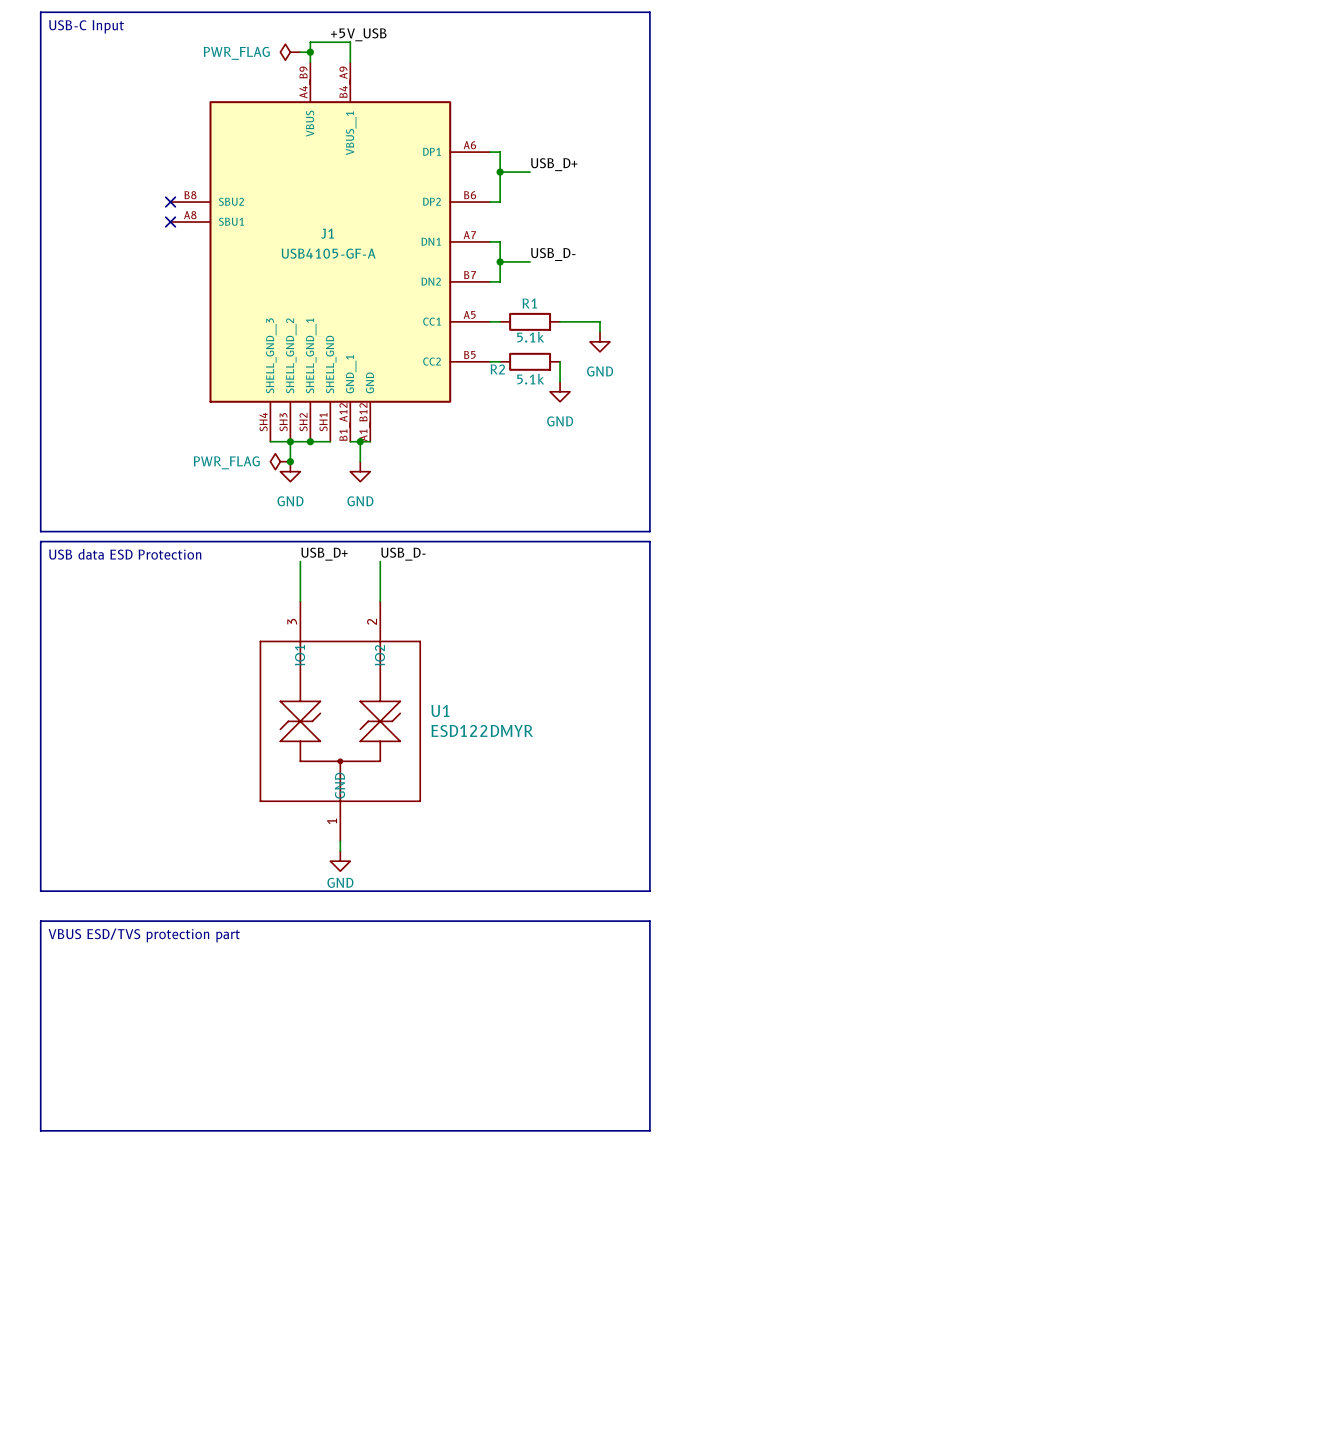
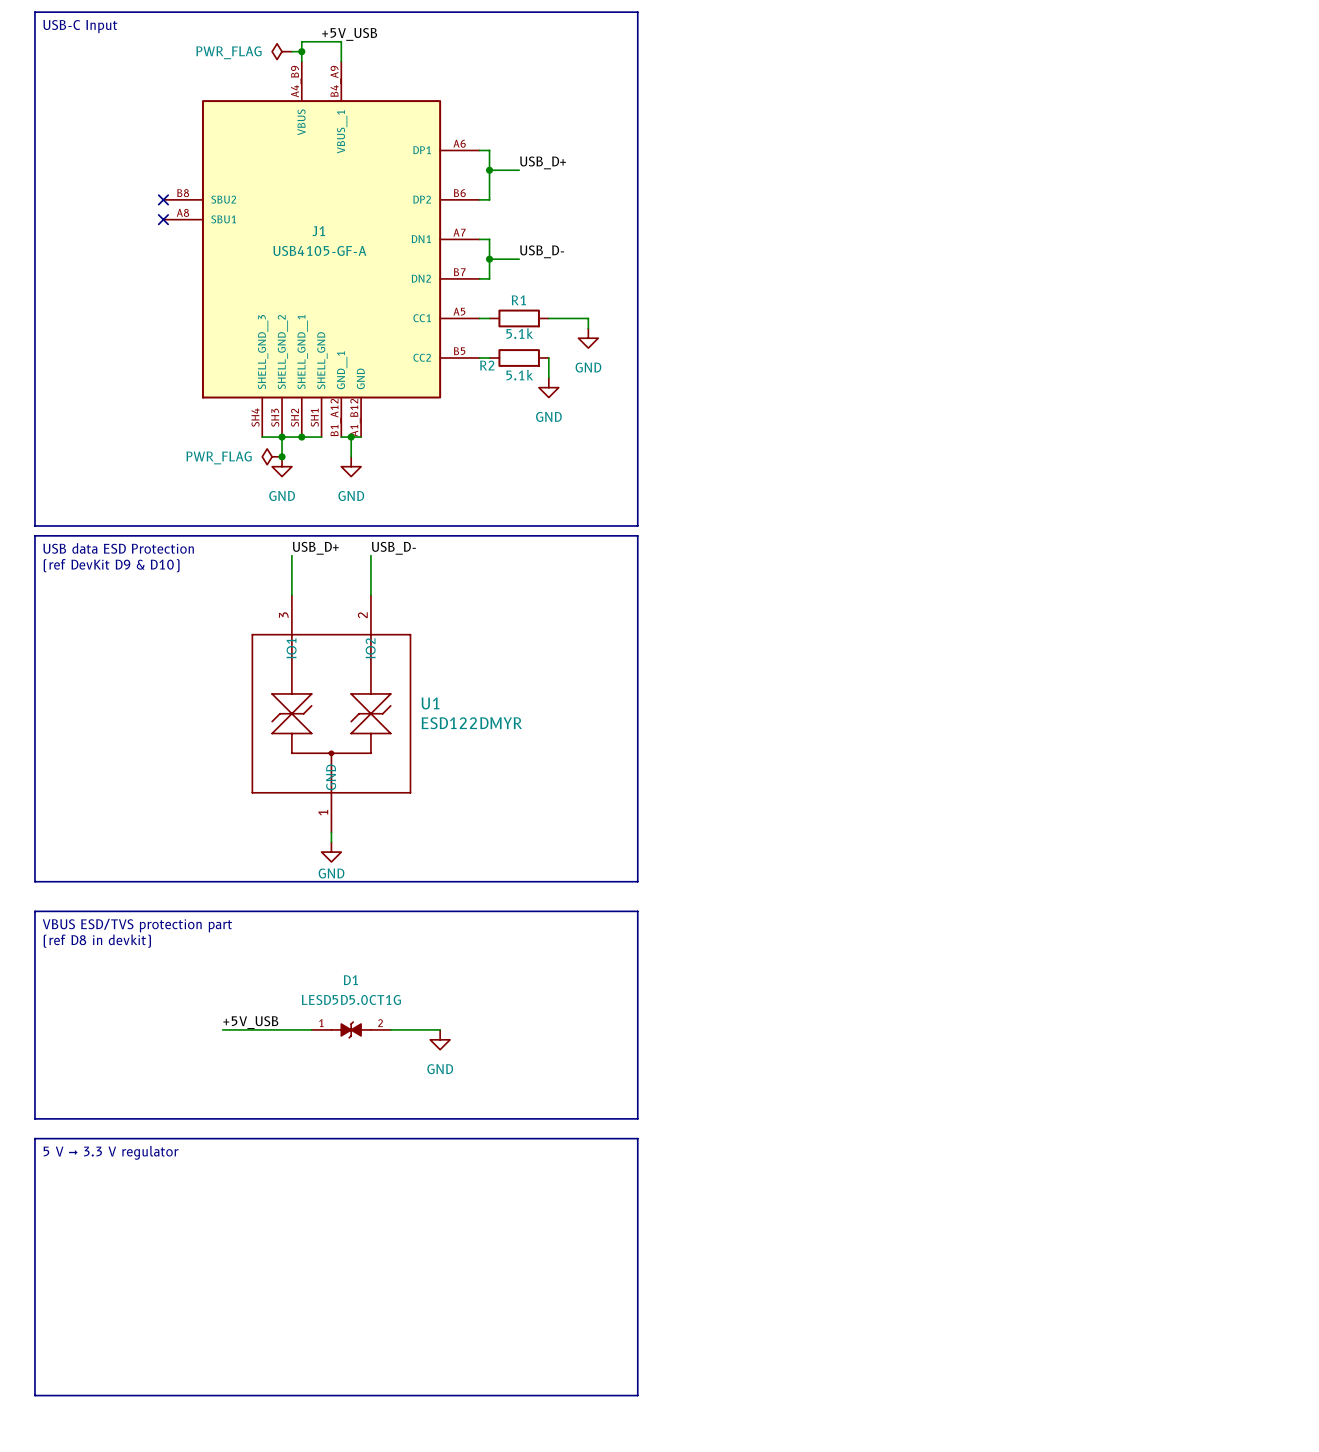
text: none -> (ref DevKit D9 & D10) (111, 565)
text: none -> (ref D8 in devkit) (97, 941)
label: none -> +5V_USB (250, 1022)
wire: none -> (222, 1029) (311, 1029)
D1: none -> LESD5D5.0CT1G (351, 1029)
wire: none -> (390, 1029) (440, 1029)
power symbol: none -> GND (440, 1039)
line: none -> (34, 1138) (637, 1138) (637, 1395) (34, 1395) (34, 1138)
text: none -> 5 V → 3.3 V regulator (111, 1152)

